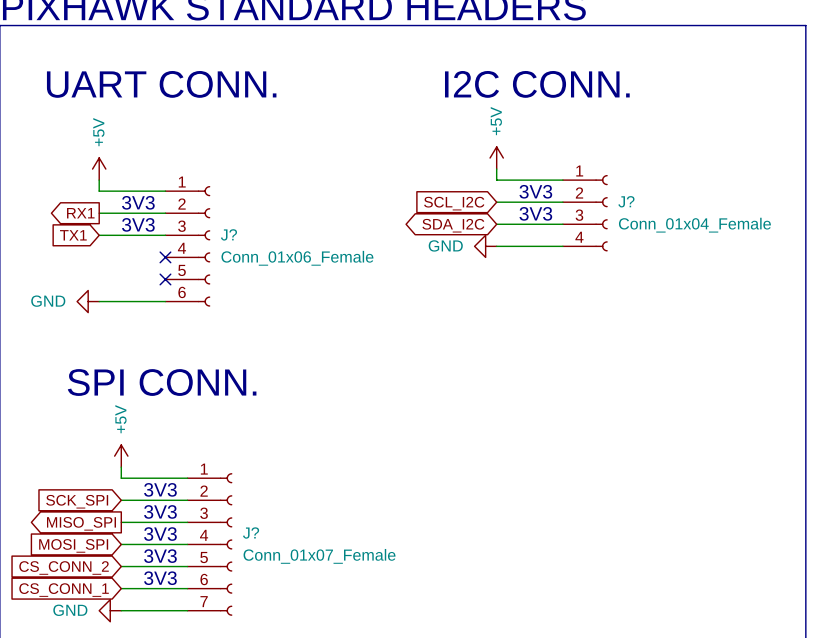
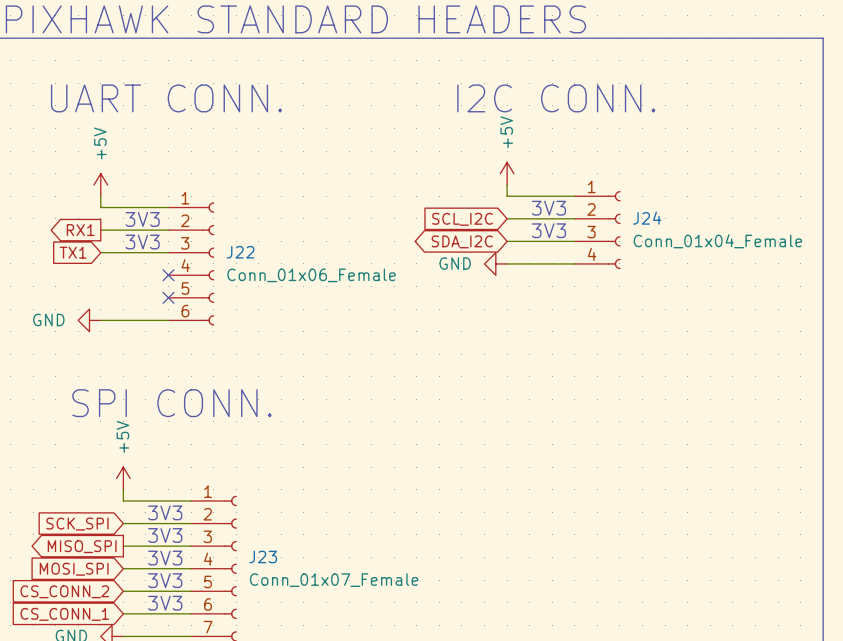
J? name: J? (626, 201) -> J24 (647, 218)
J? name: J? (228, 234) -> J22 (240, 252)
J? name: J? (251, 533) -> J23 (263, 557)

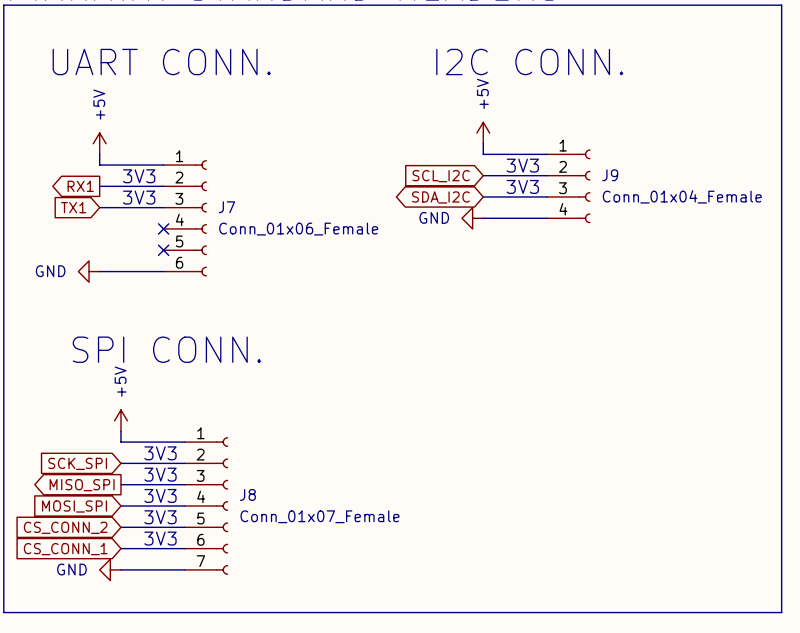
J24 name: J24 (647, 218) -> J9 (610, 175)
J22 name: J22 (240, 252) -> J7 (226, 207)
J23 name: J23 (263, 557) -> J8 (247, 494)

